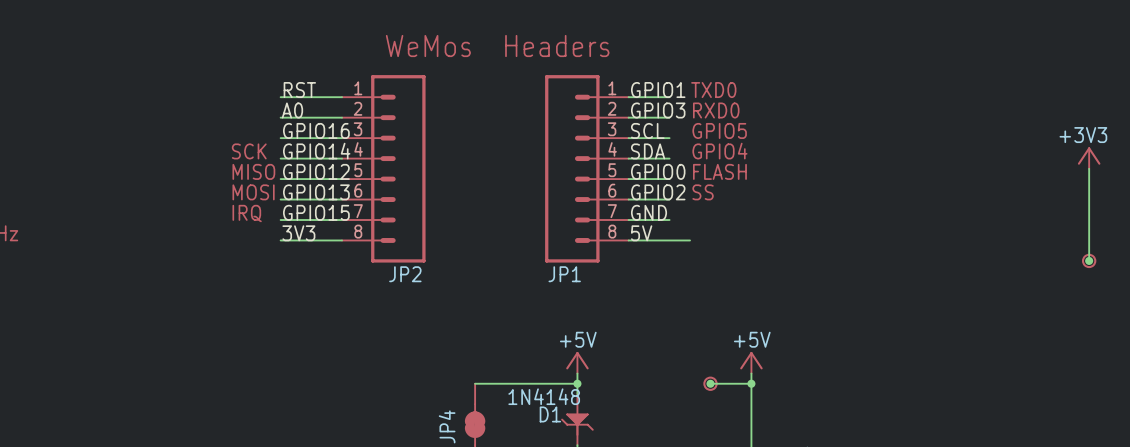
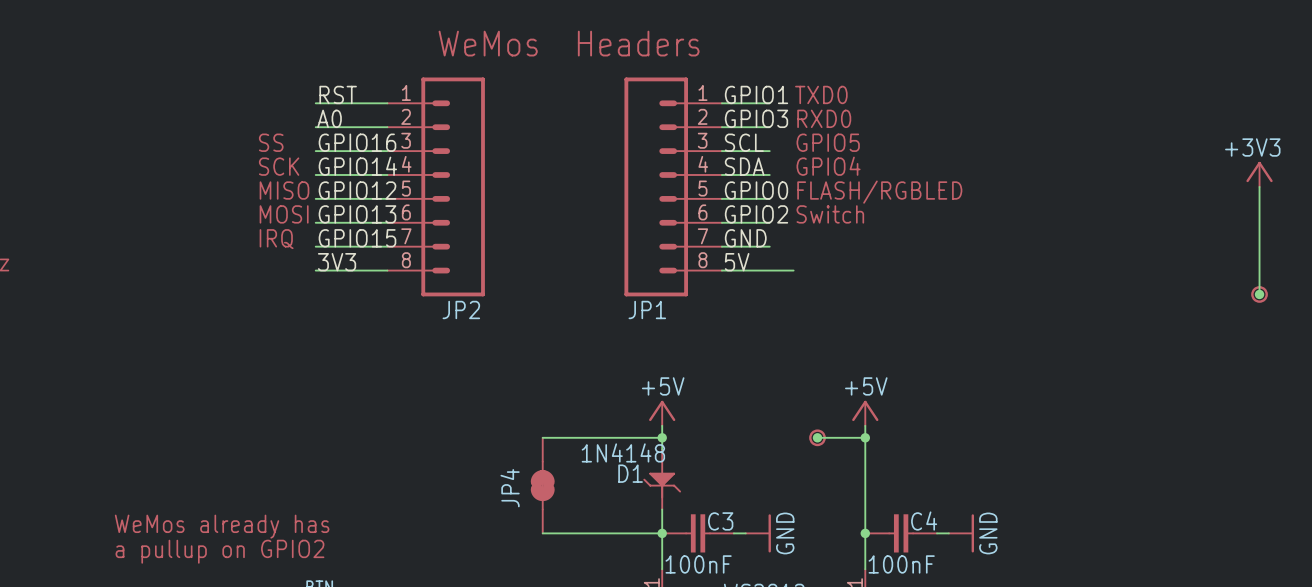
text: none -> SS (271, 142)
text: FLASH (719, 171) -> FLASH/RGBLED (879, 192)
text: SS (703, 192) -> Switch (830, 214)

